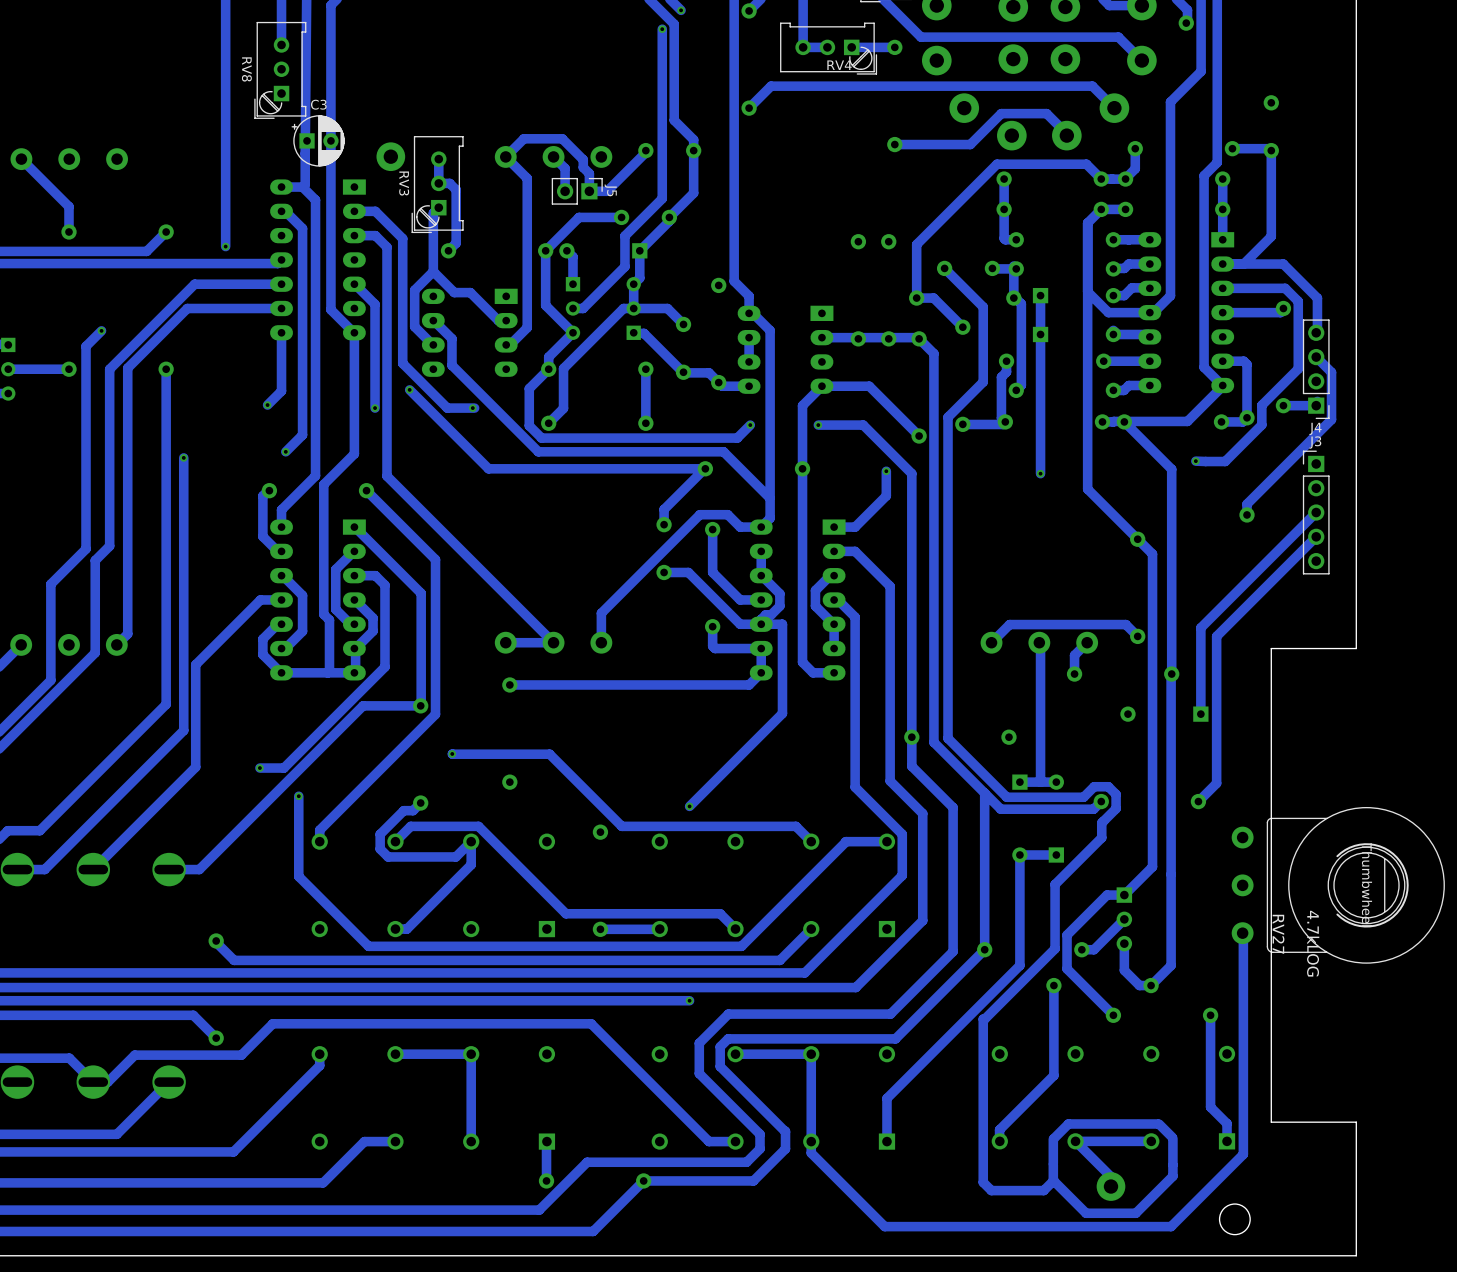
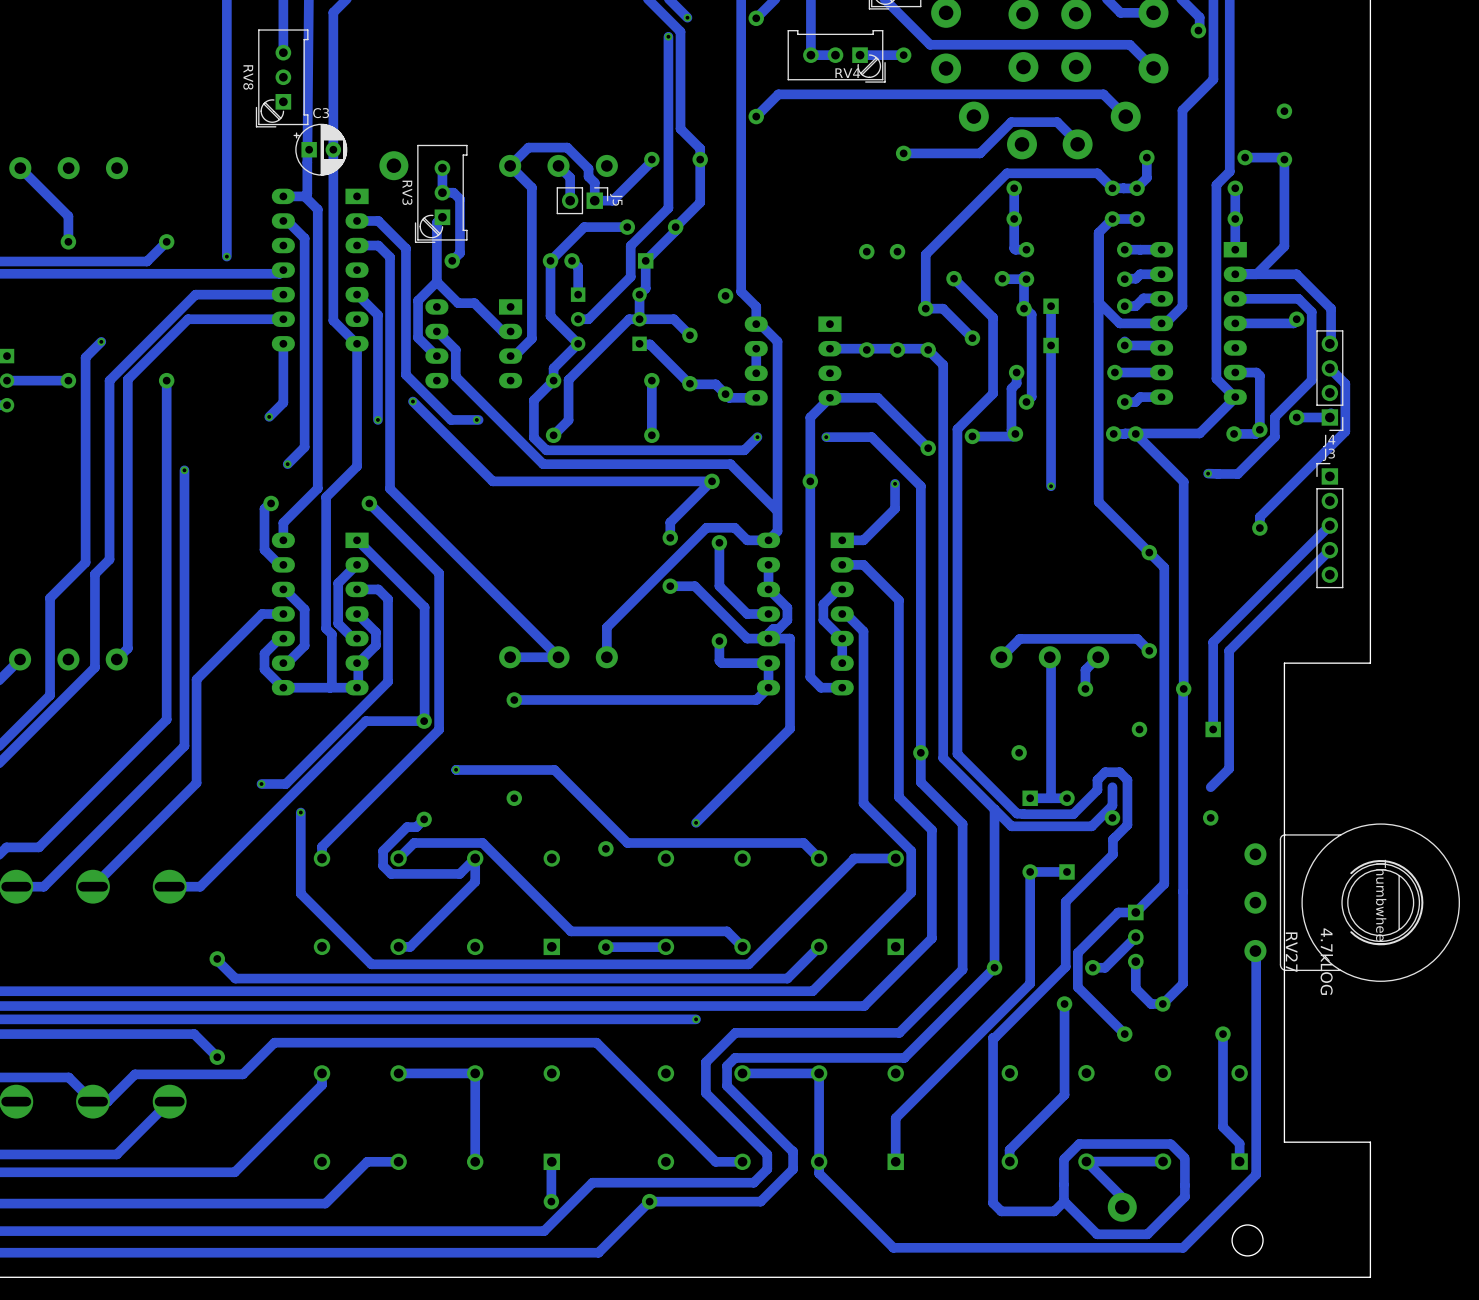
track: (1216, 752) (1216, 783) (1198, 801) -> (1229, 768) (1210, 787)
track: (1116, 794) (1108, 786) (1094, 786) (1083, 797) (1006, 797) -> (1127, 810) (1127, 780) (1119, 772) (1105, 772) (1097, 780) (1097, 789) (1073, 814) (1016, 813)
track: (1101, 801) (1093, 809) (1000, 809) -> (1112, 787) (1112, 805) (1091, 826) (1010, 825)

